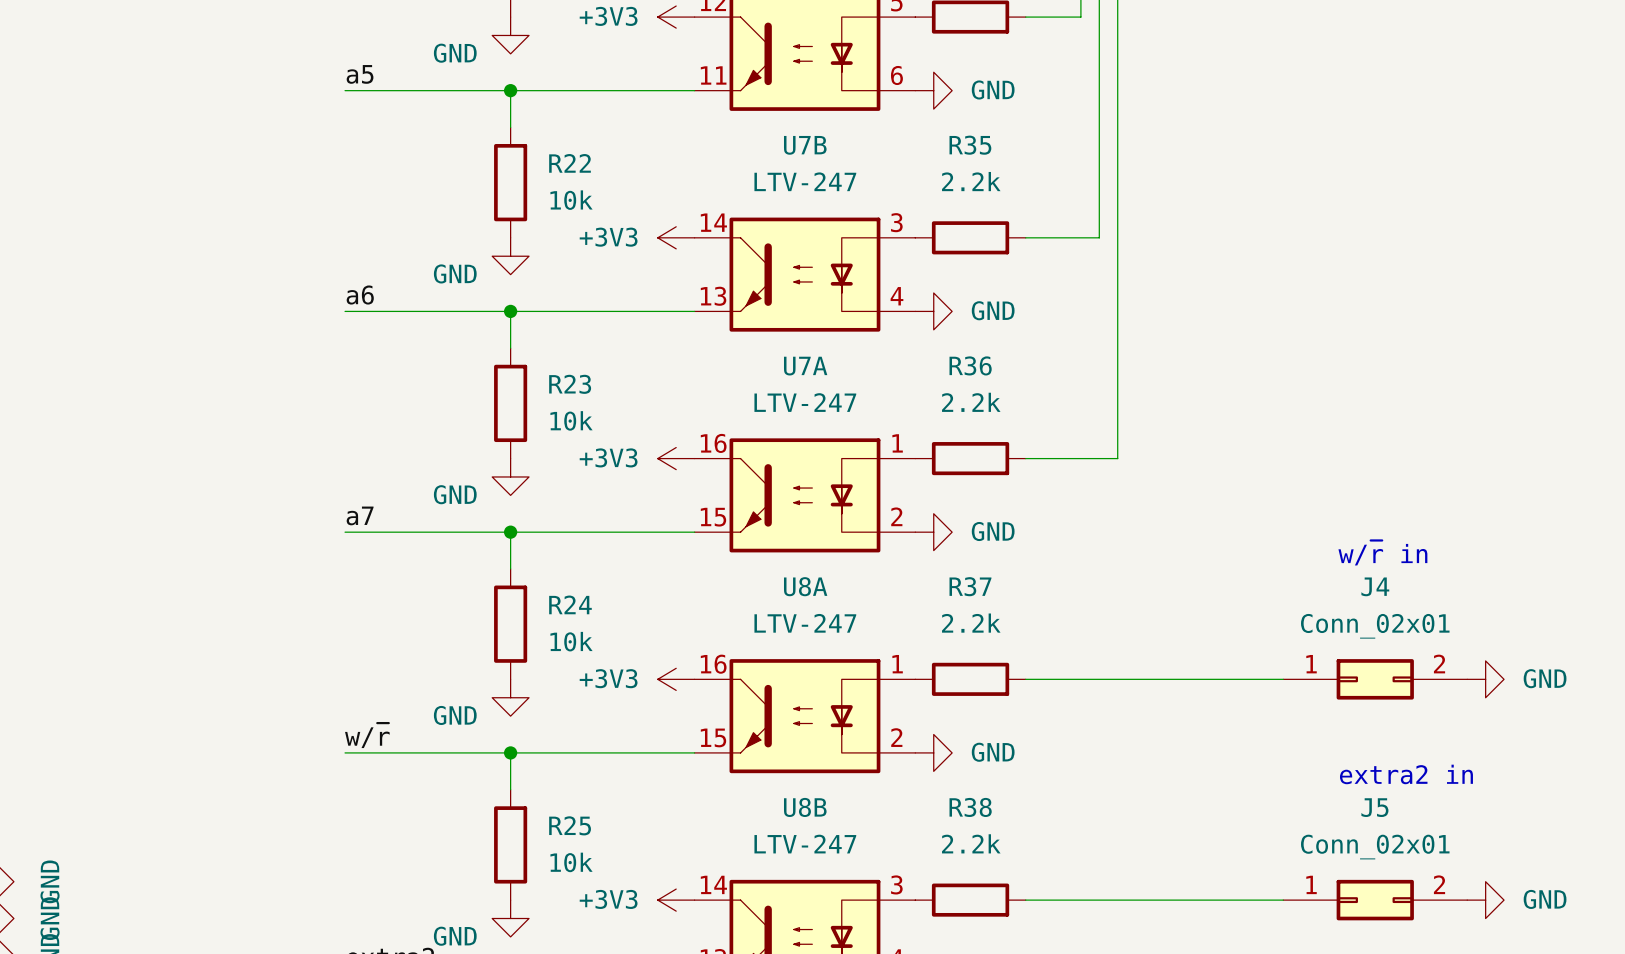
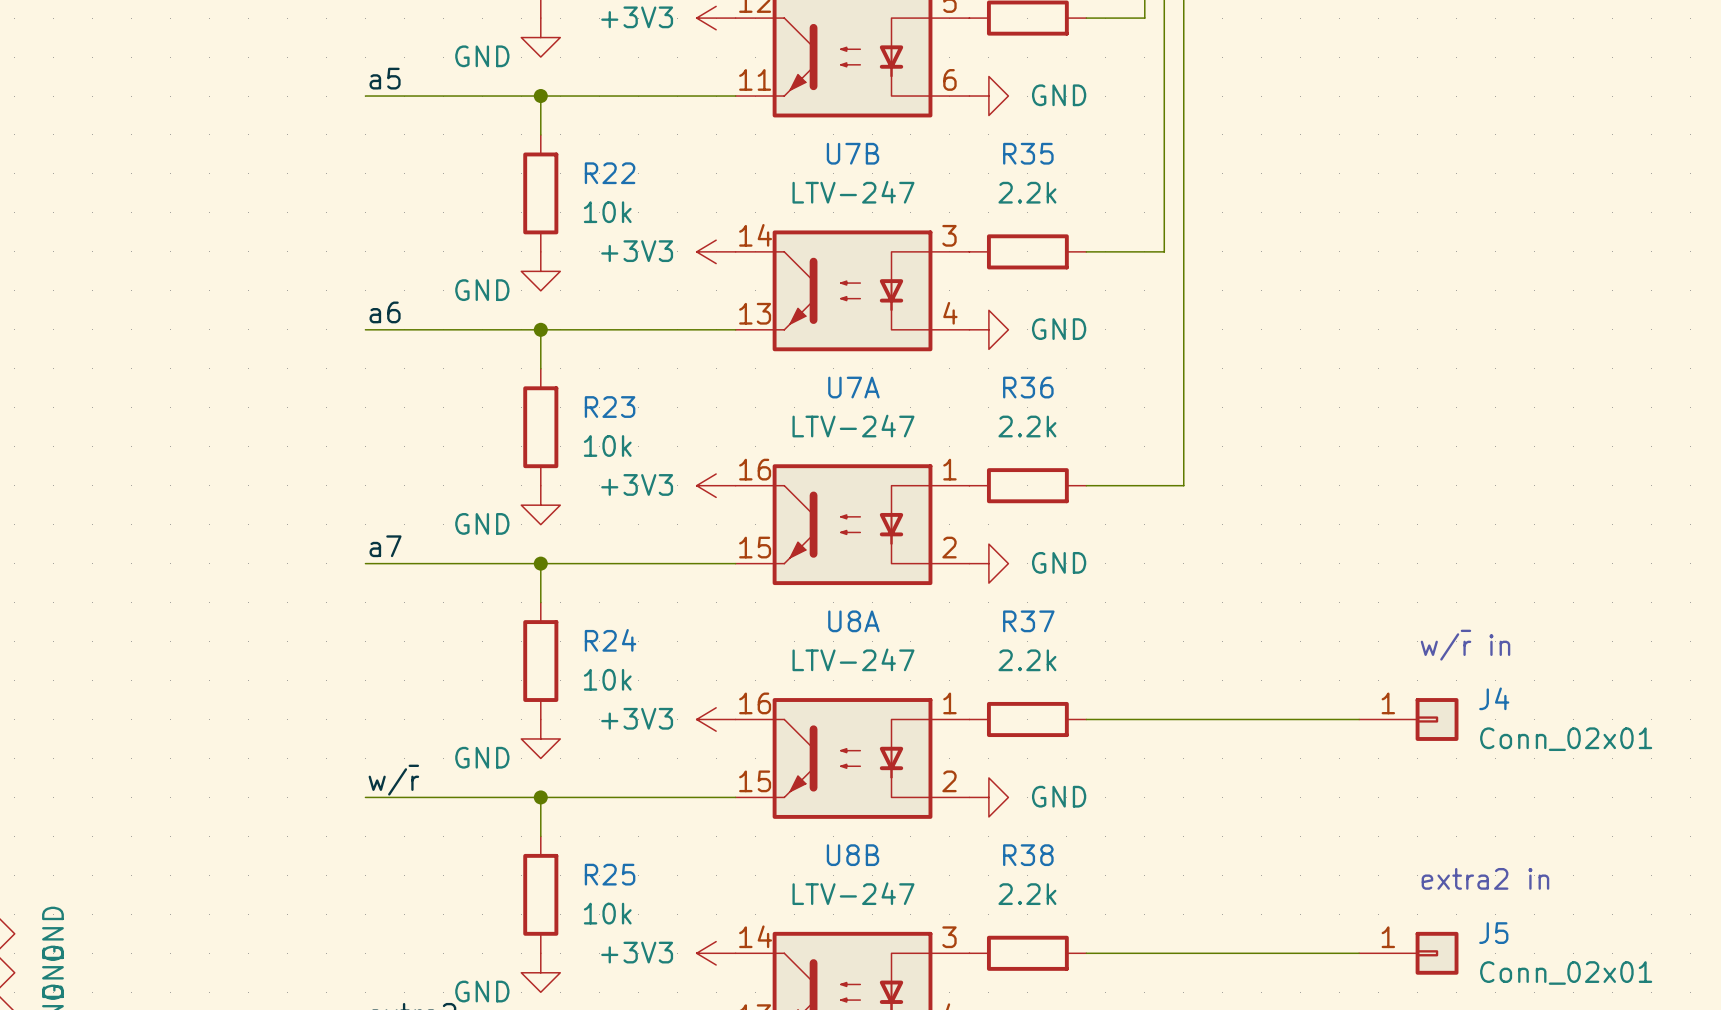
text position: w/~{r} in (1382, 552) -> w/~{r} in (1465, 645)
J4 name position: J4 (1375, 586) -> J4 (1494, 698)
J4 value position: Conn_02x01 (1375, 626) -> Conn_02x01 (1566, 739)
J4 symbol: [1283, 659, 1468, 700] -> [1359, 698, 1459, 741]
power symbol: GND (1485, 679) -> none
text position: extra2 in (1406, 774) -> extra2 in (1485, 878)
J5 name position: J5 (1374, 807) -> J5 (1493, 933)
J5 value position: Conn_02x01 (1375, 847) -> Conn_02x01 (1566, 972)
J5 symbol: [1283, 879, 1468, 921] -> [1359, 931, 1459, 975]
power symbol: GND (1485, 900) -> none

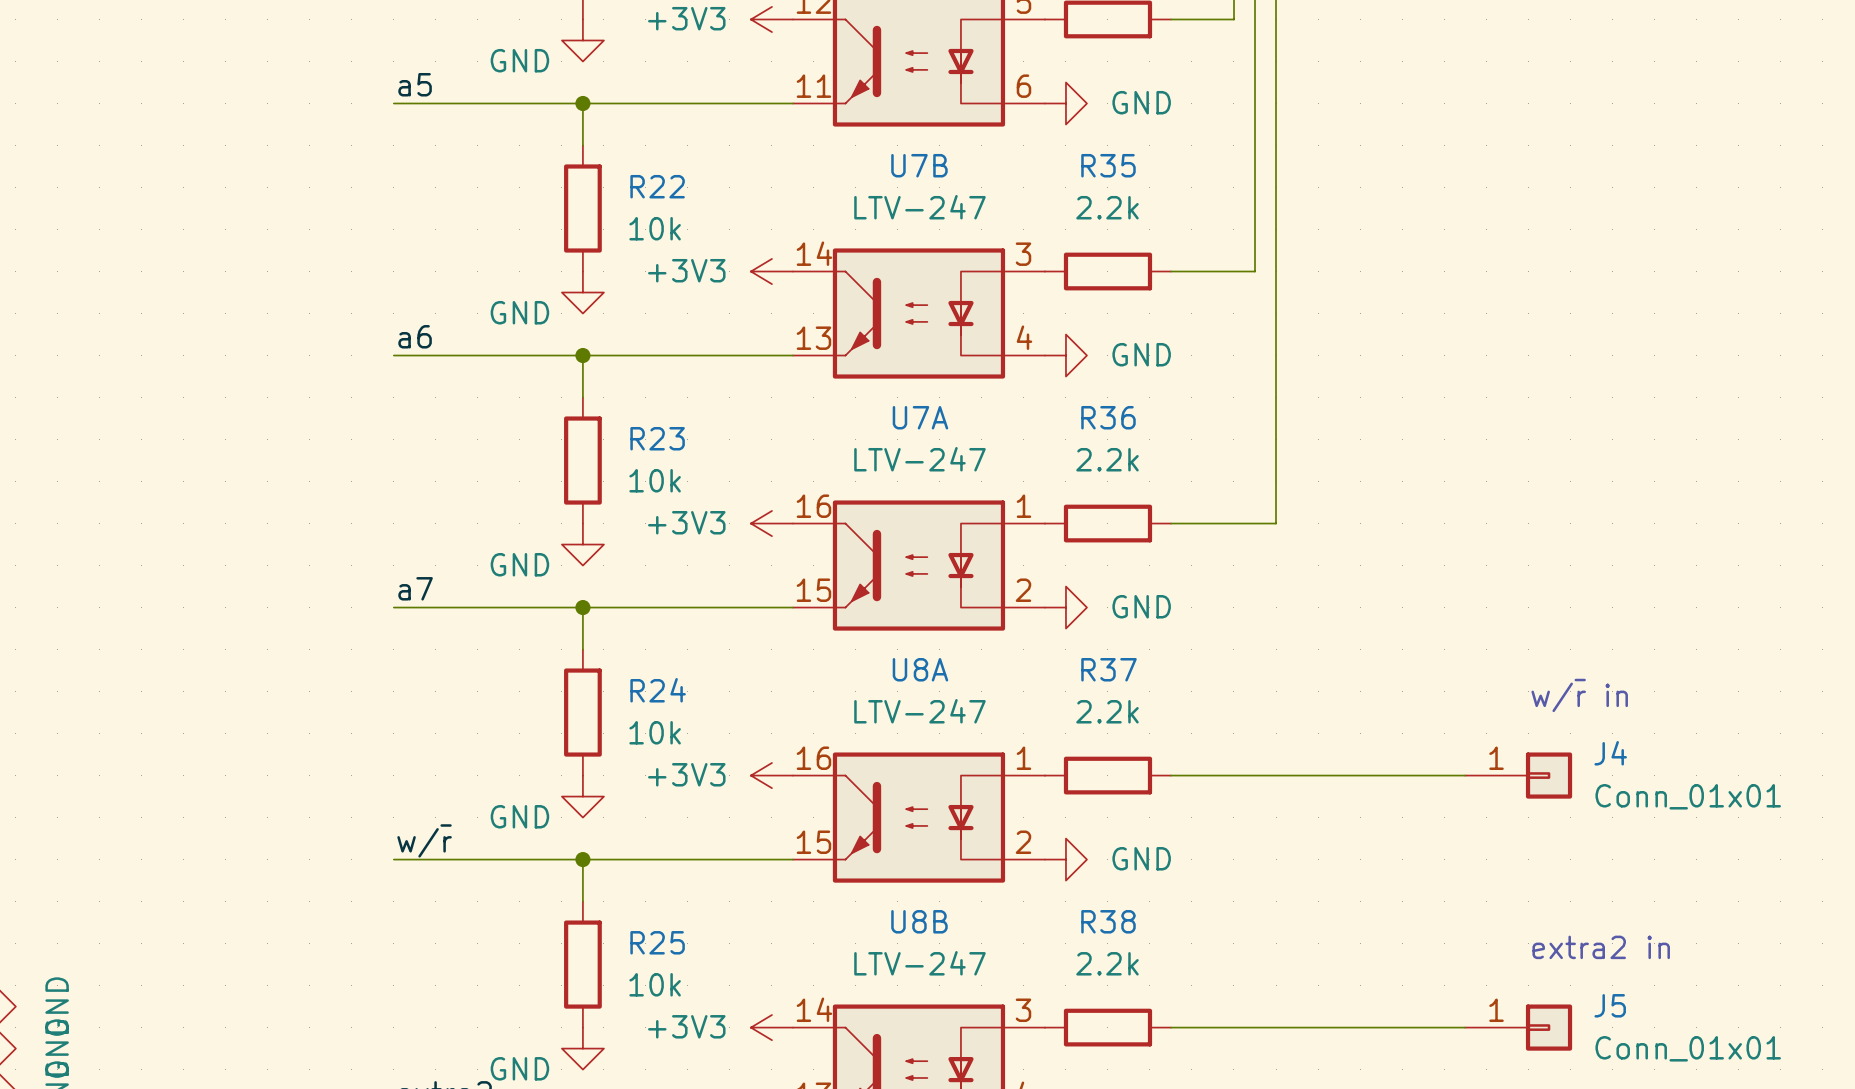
J4 value: Conn_02x01 (1566, 739) -> Conn_01x01 (1688, 796)
J5 value: Conn_02x01 (1566, 972) -> Conn_01x01 (1688, 1048)

